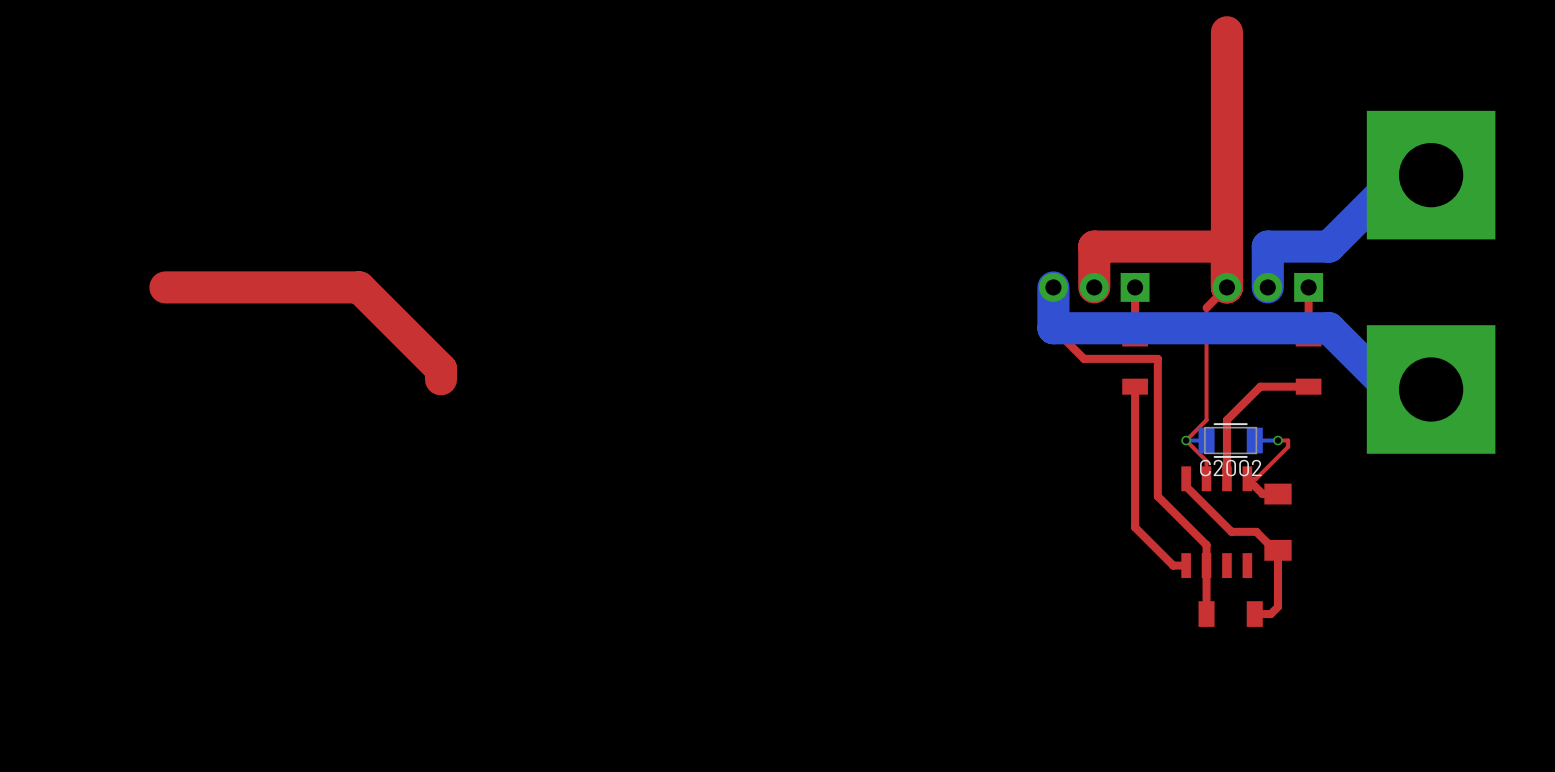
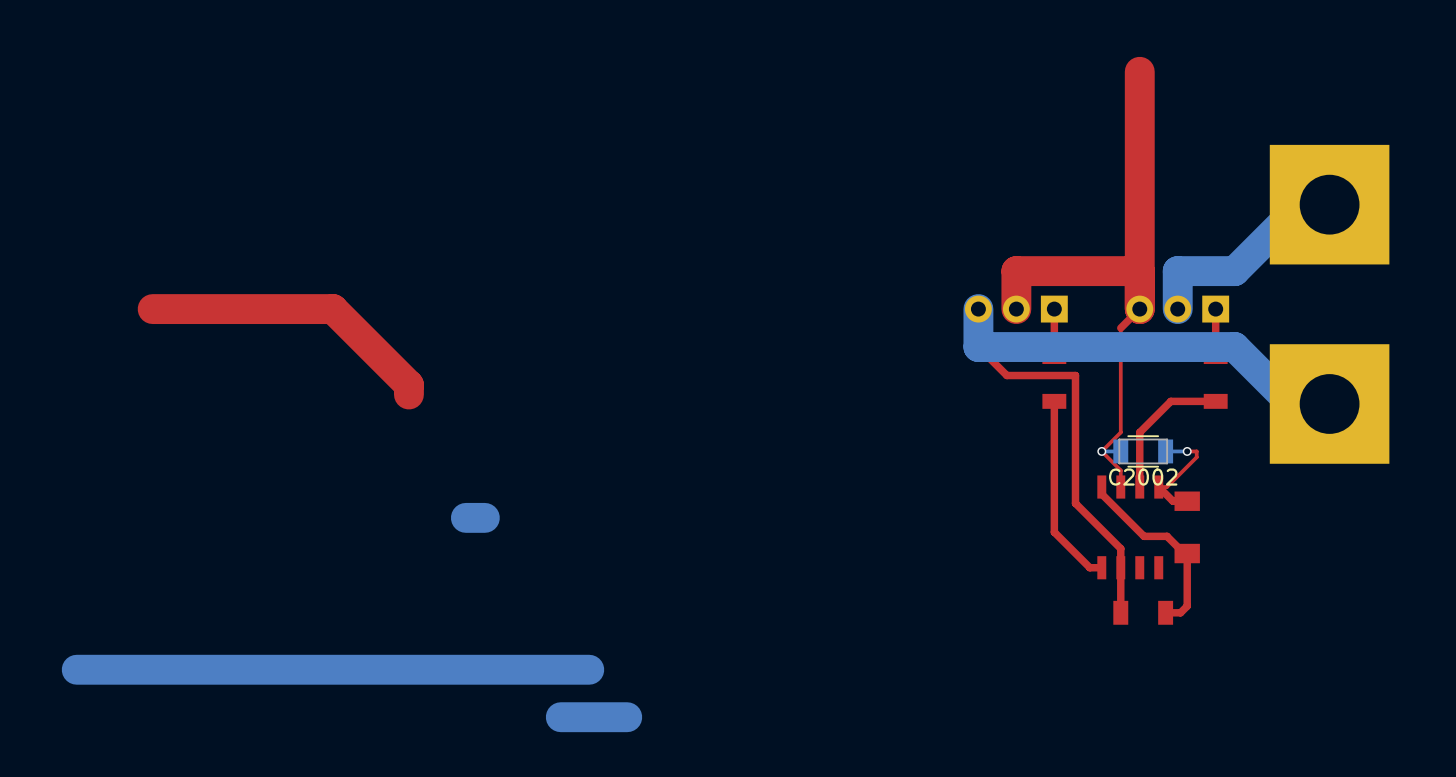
bottom track: none -> (484, 517) (465, 517)
bottom track: none -> (589, 669) (76, 669)
bottom track: none -> (627, 717) (560, 717)

